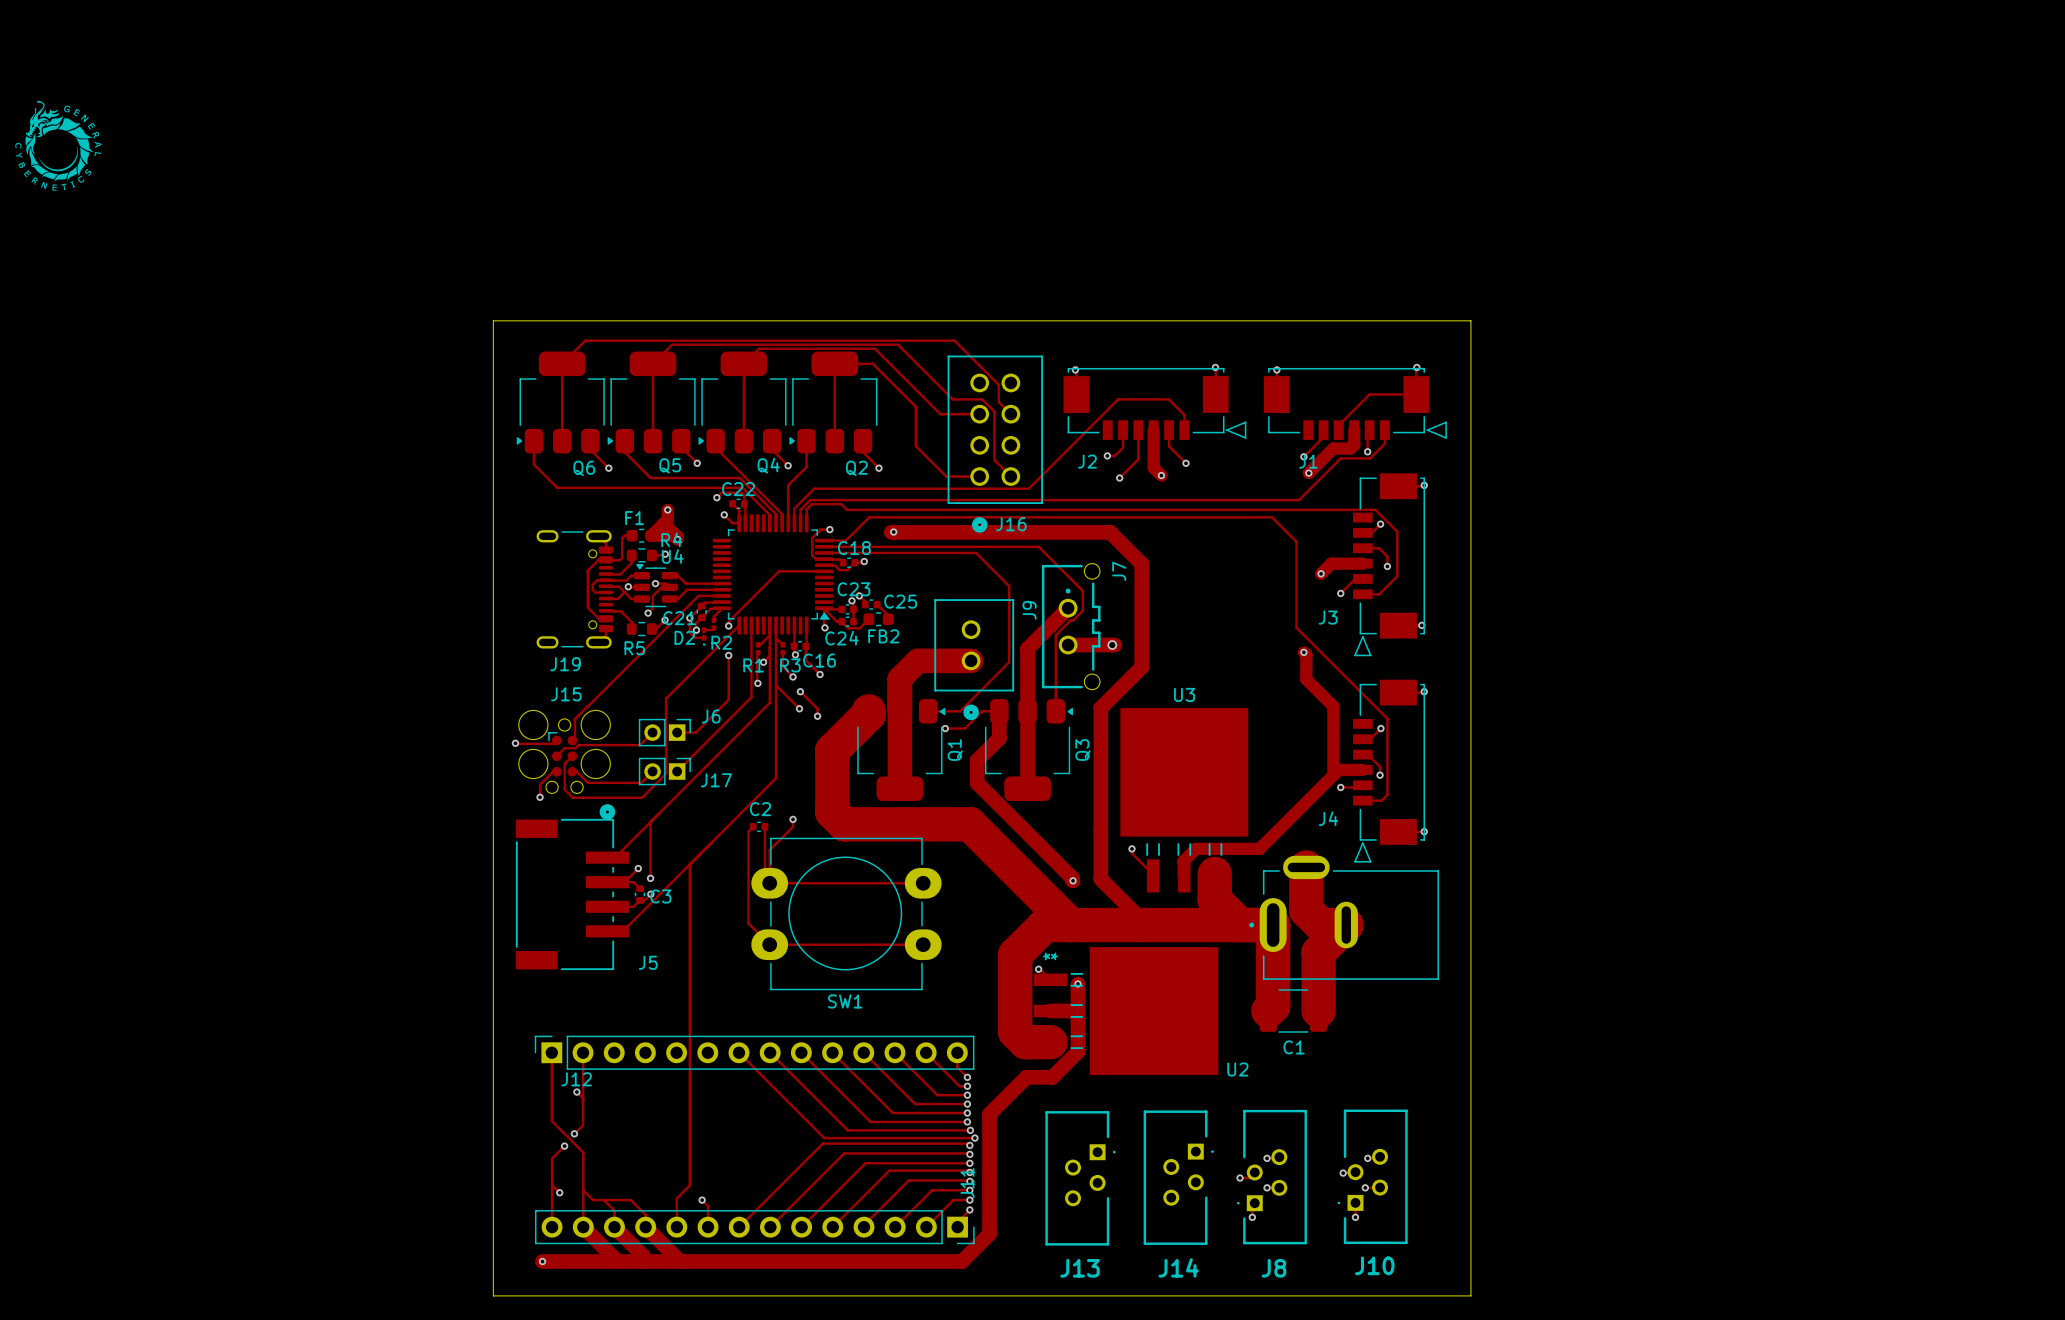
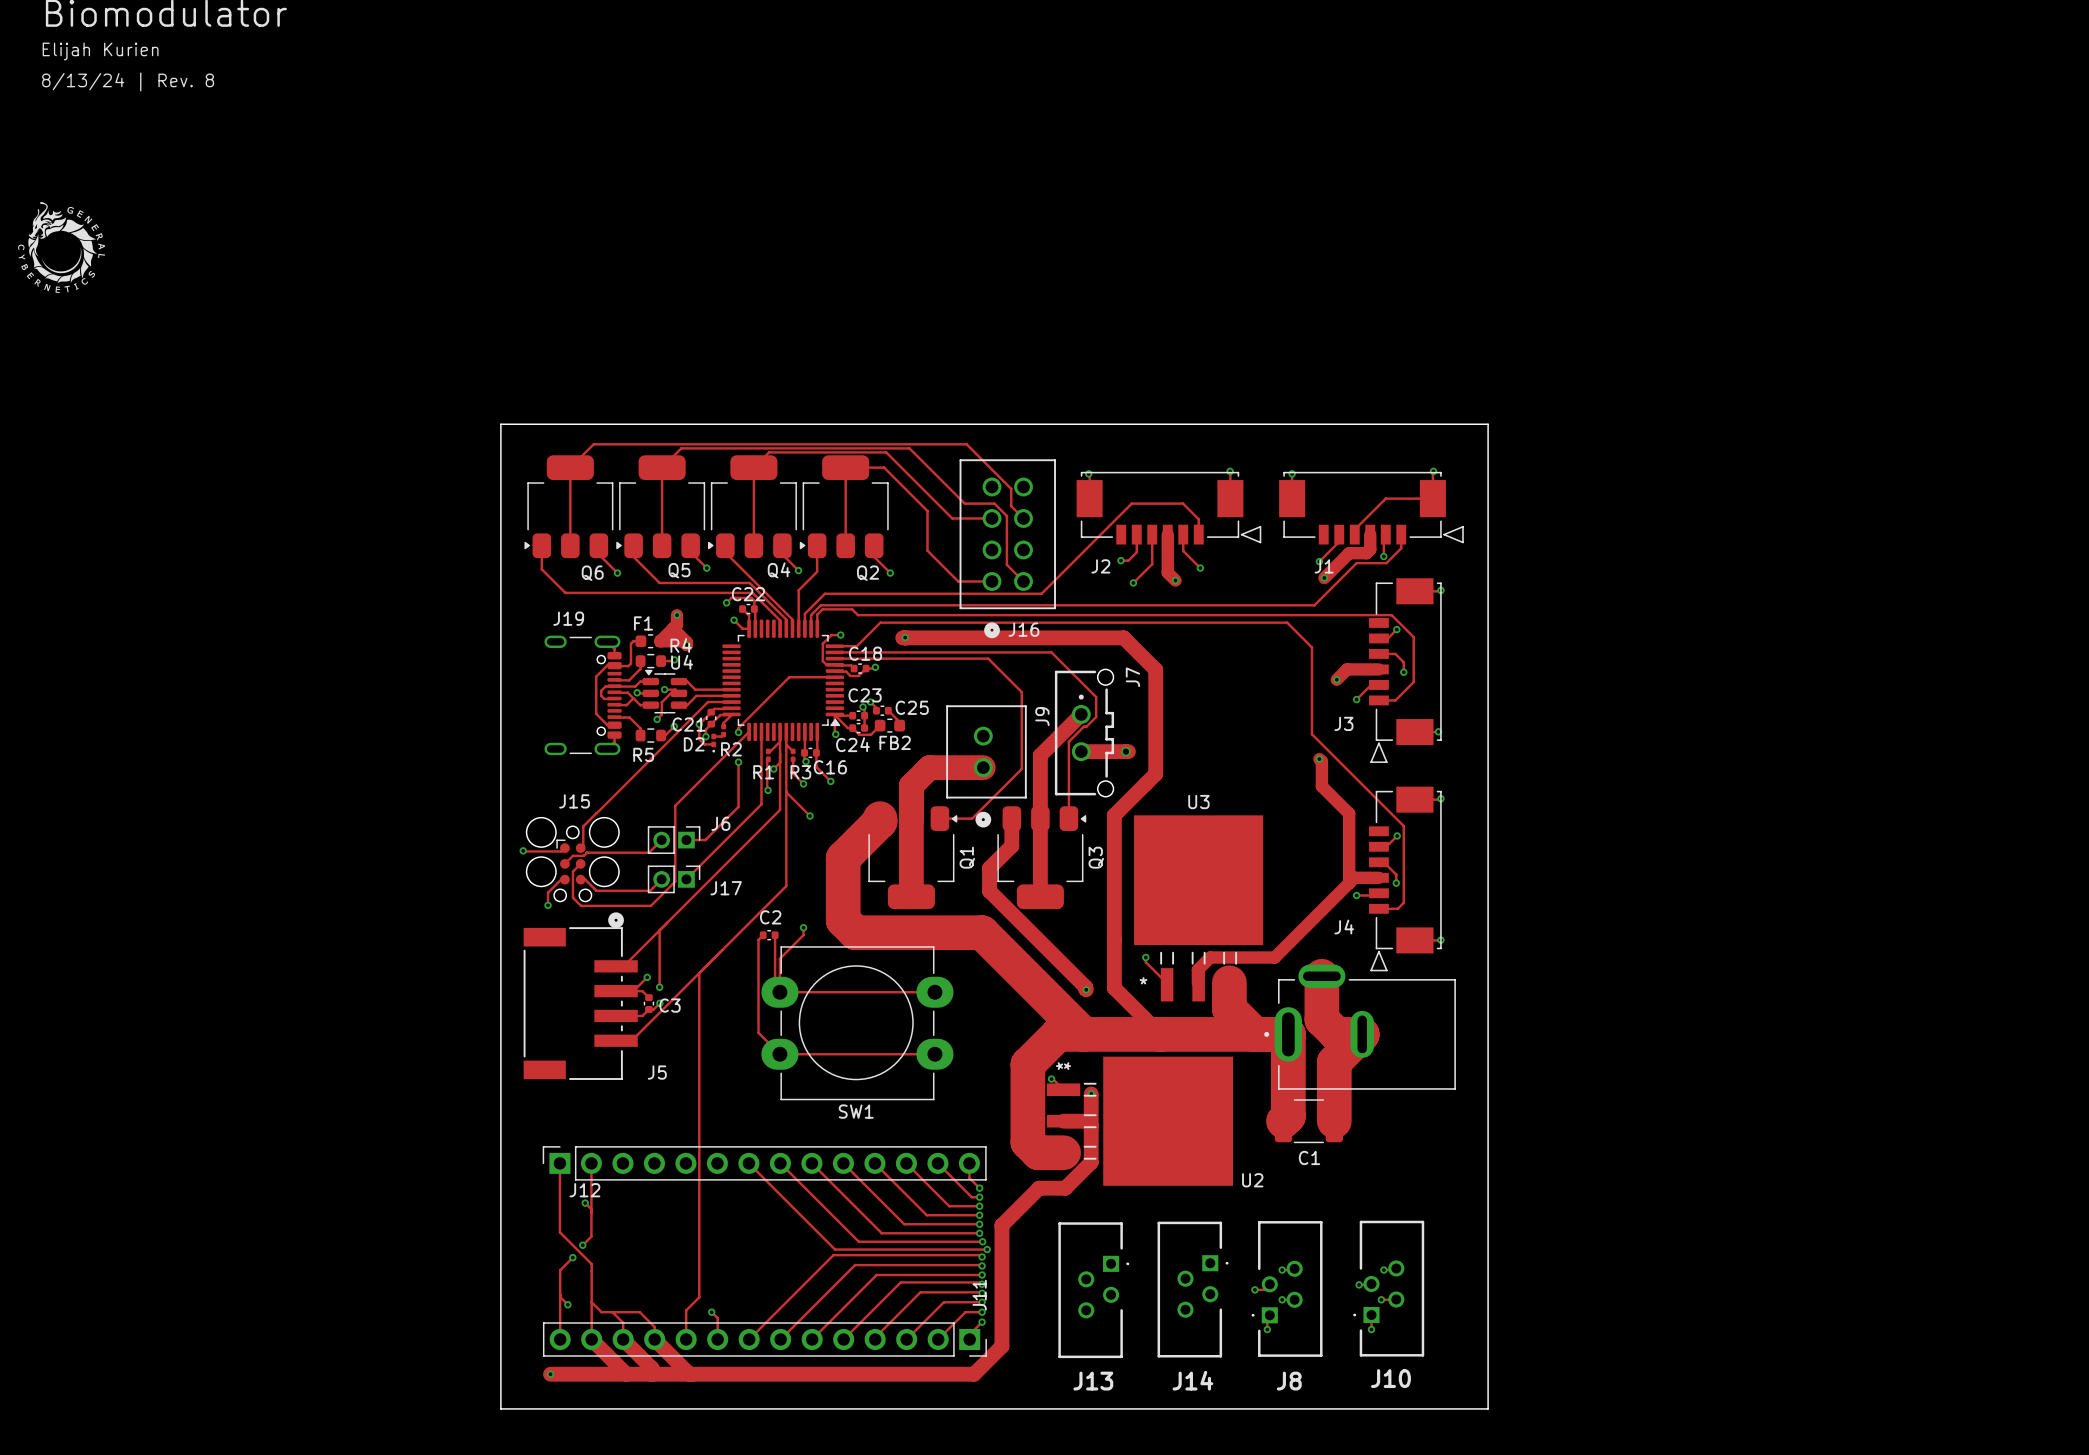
J19 name position: J19 (565, 664) -> J19 (568, 618)
track: (800, 691) (817, 708) (817, 716) -> none
via: (800, 691) -> none
track: (999, 711) (982, 711) (964, 728) (945, 728) -> none
via: (817, 716) -> none
via: (945, 728) -> none
U3 text: none -> * (1143, 980)

